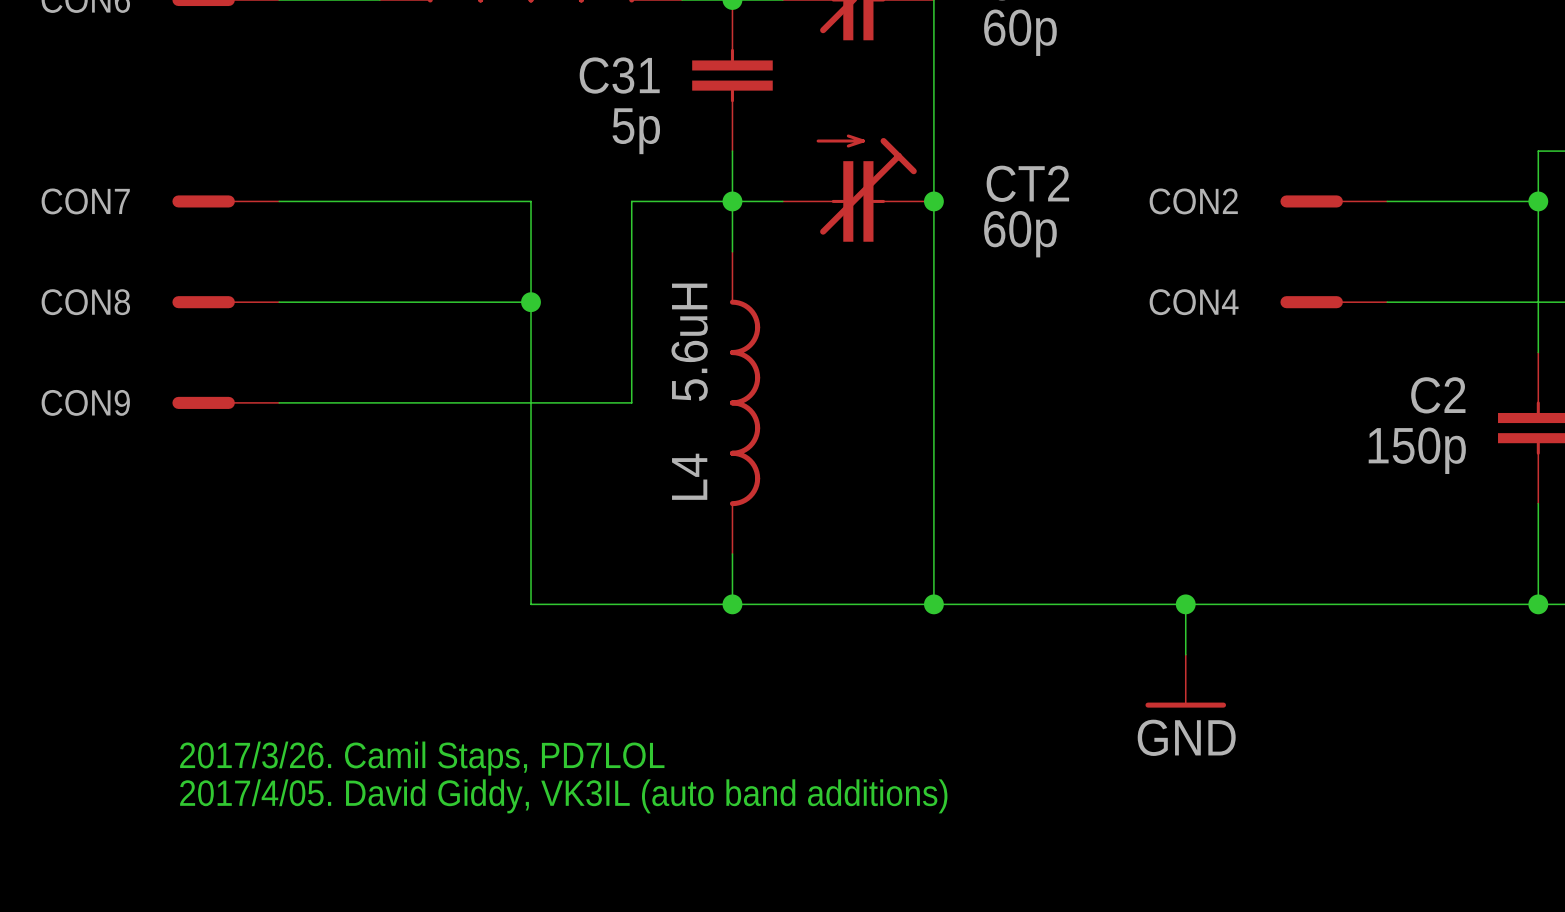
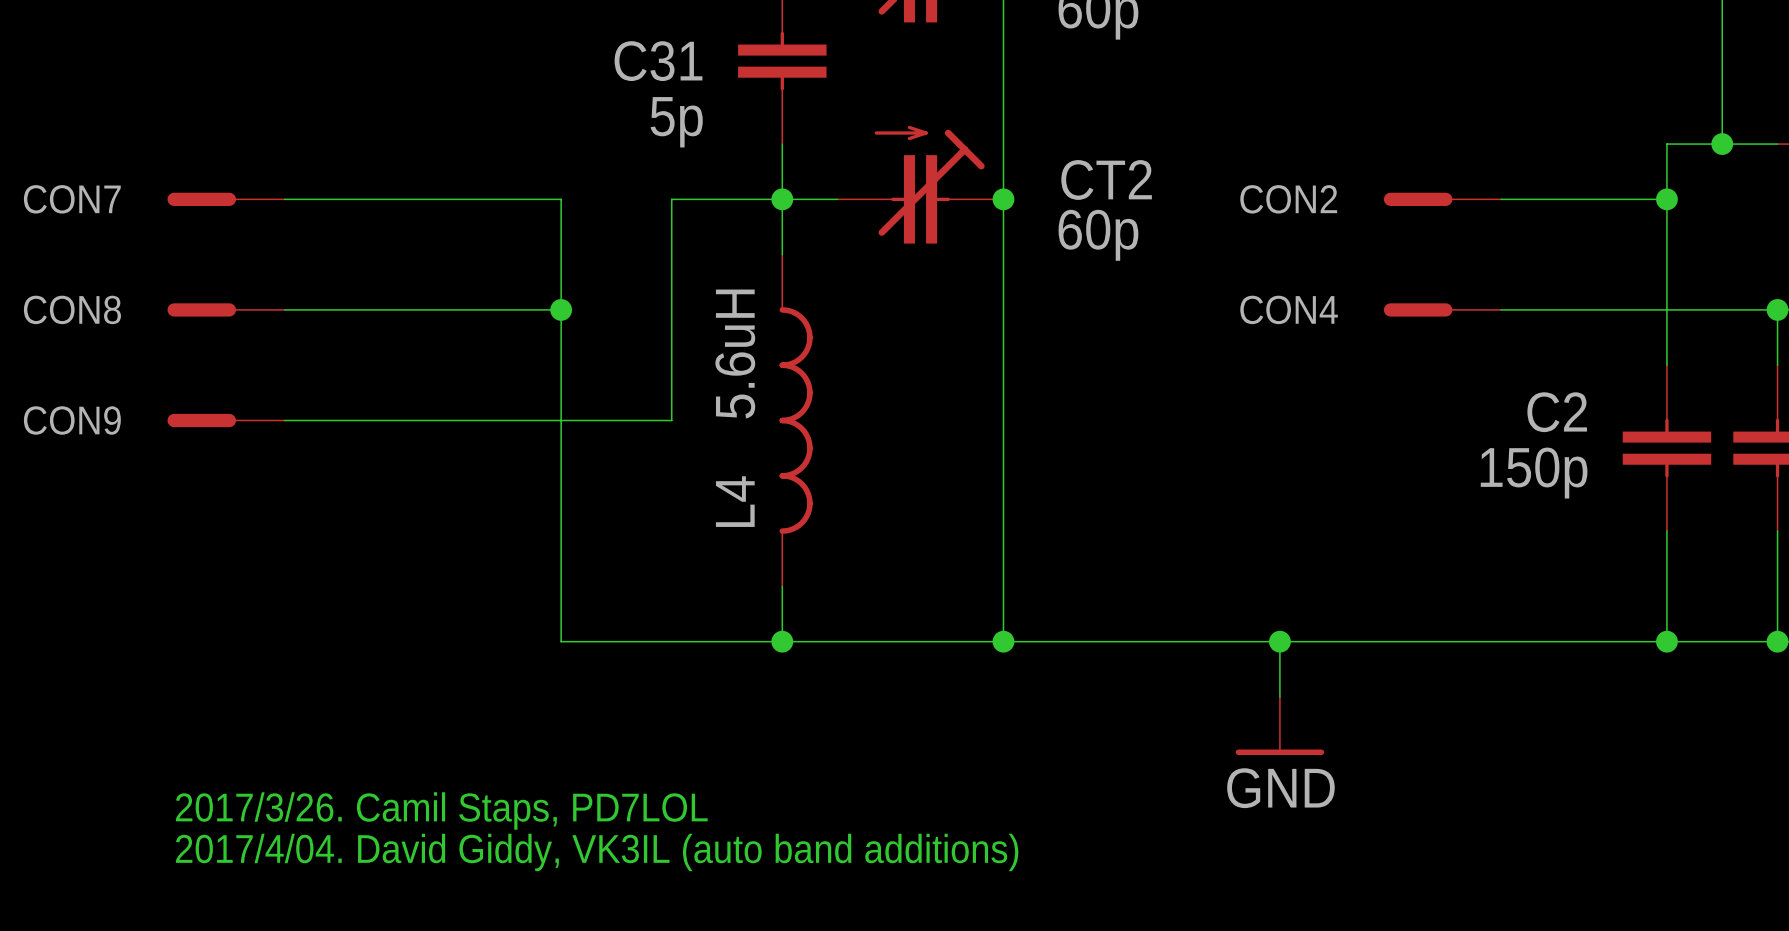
text: 2017/4/05. David Giddy, VK3IL (auto band additions) (563, 796) -> 2017/4/04. David Giddy, VK3IL (auto band additions) (597, 852)

